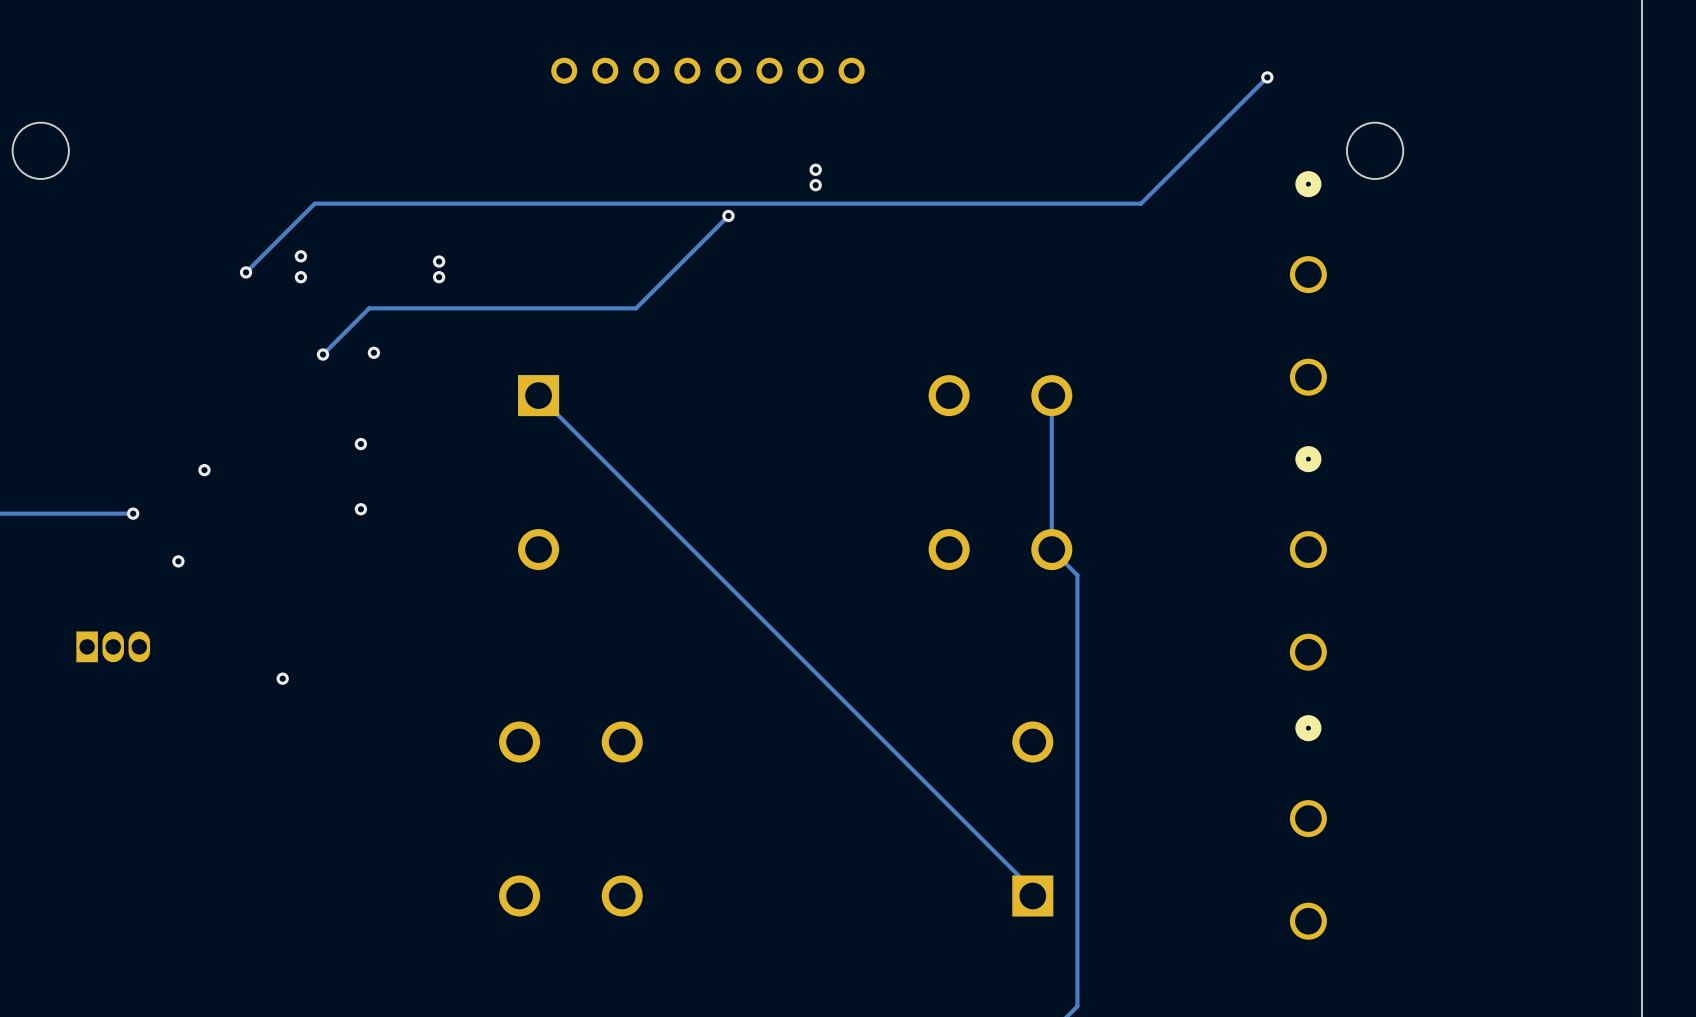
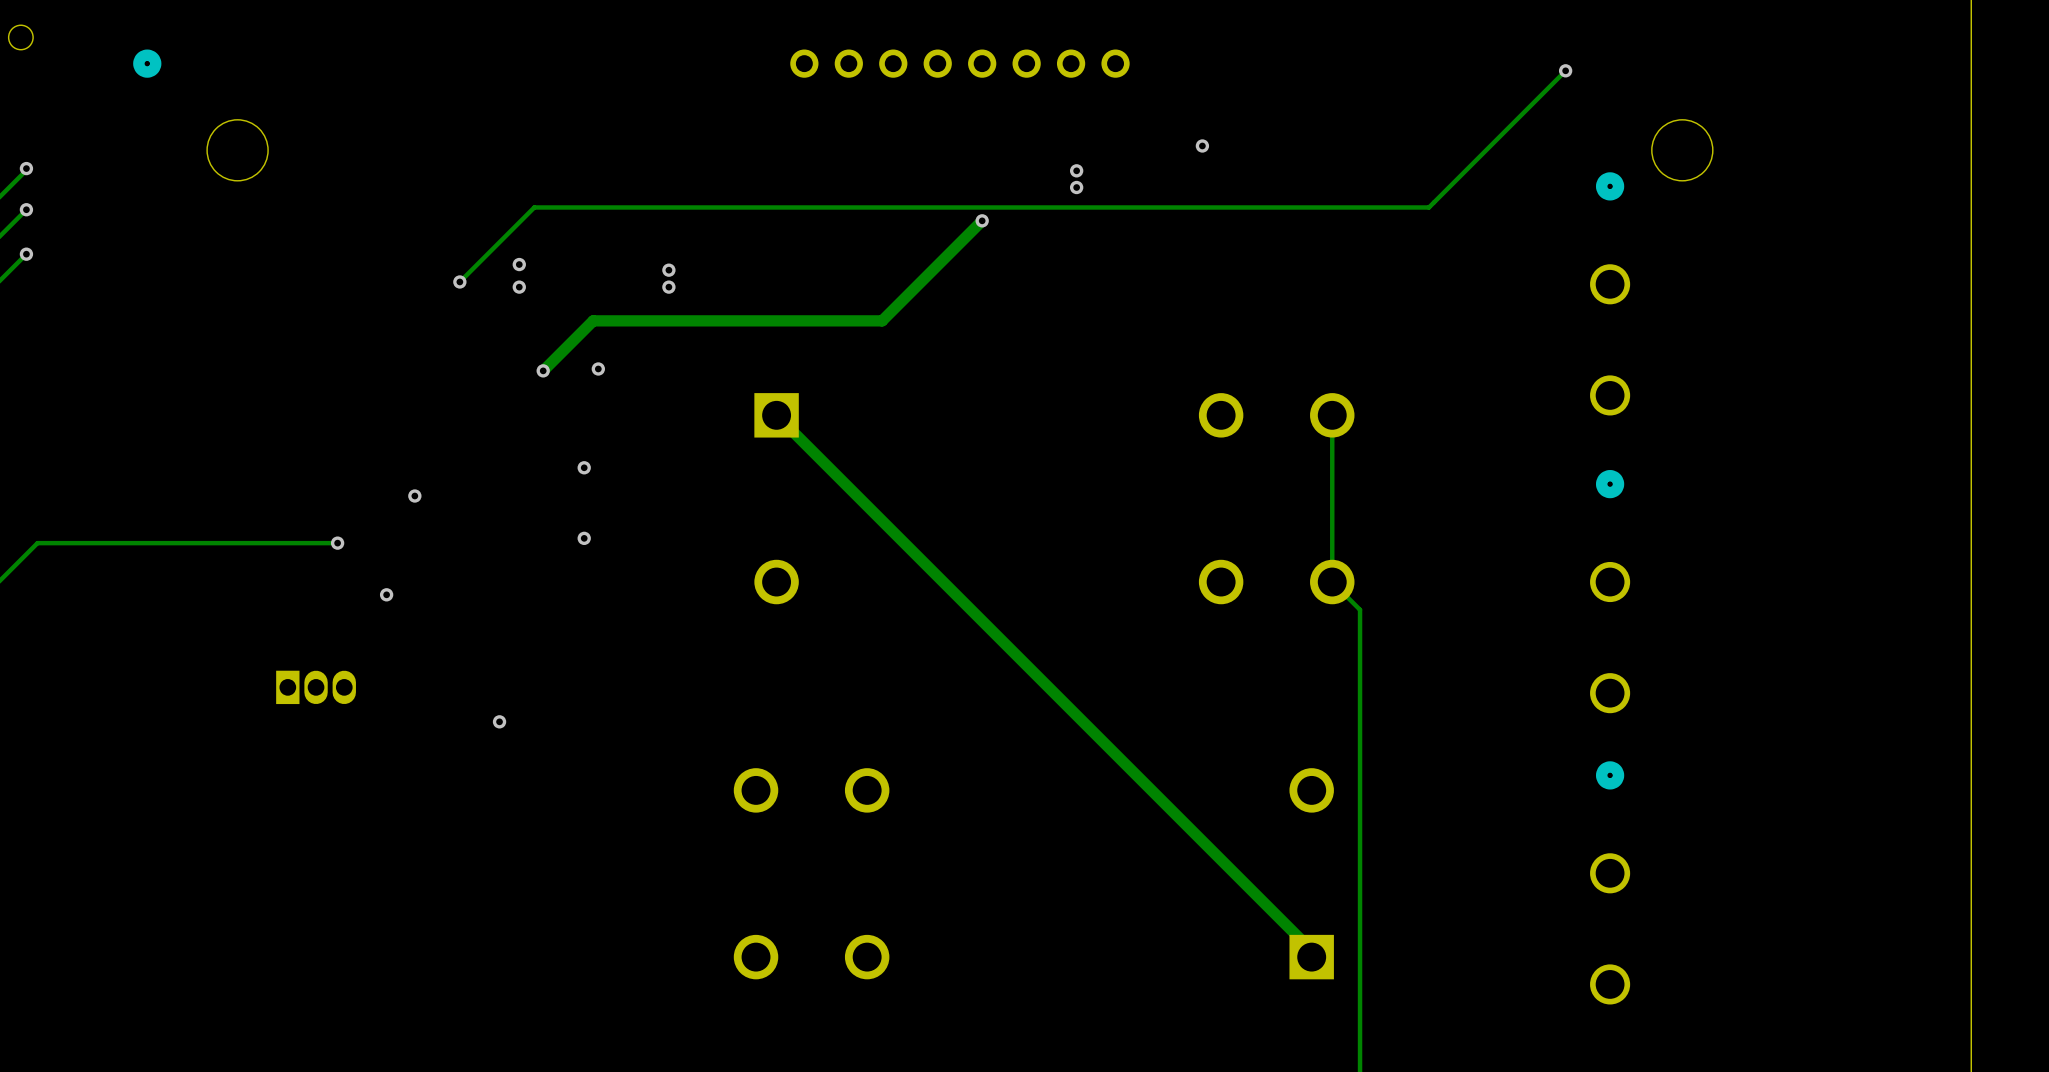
via: none -> (1202, 145)
track width: thin (728, 215) (636, 308) (369, 308) (323, 354) -> thick (982, 220) (882, 320) (593, 320) (543, 370)
track width: thin (538, 395) (1032, 889) -> thick (776, 415) (1311, 950)

